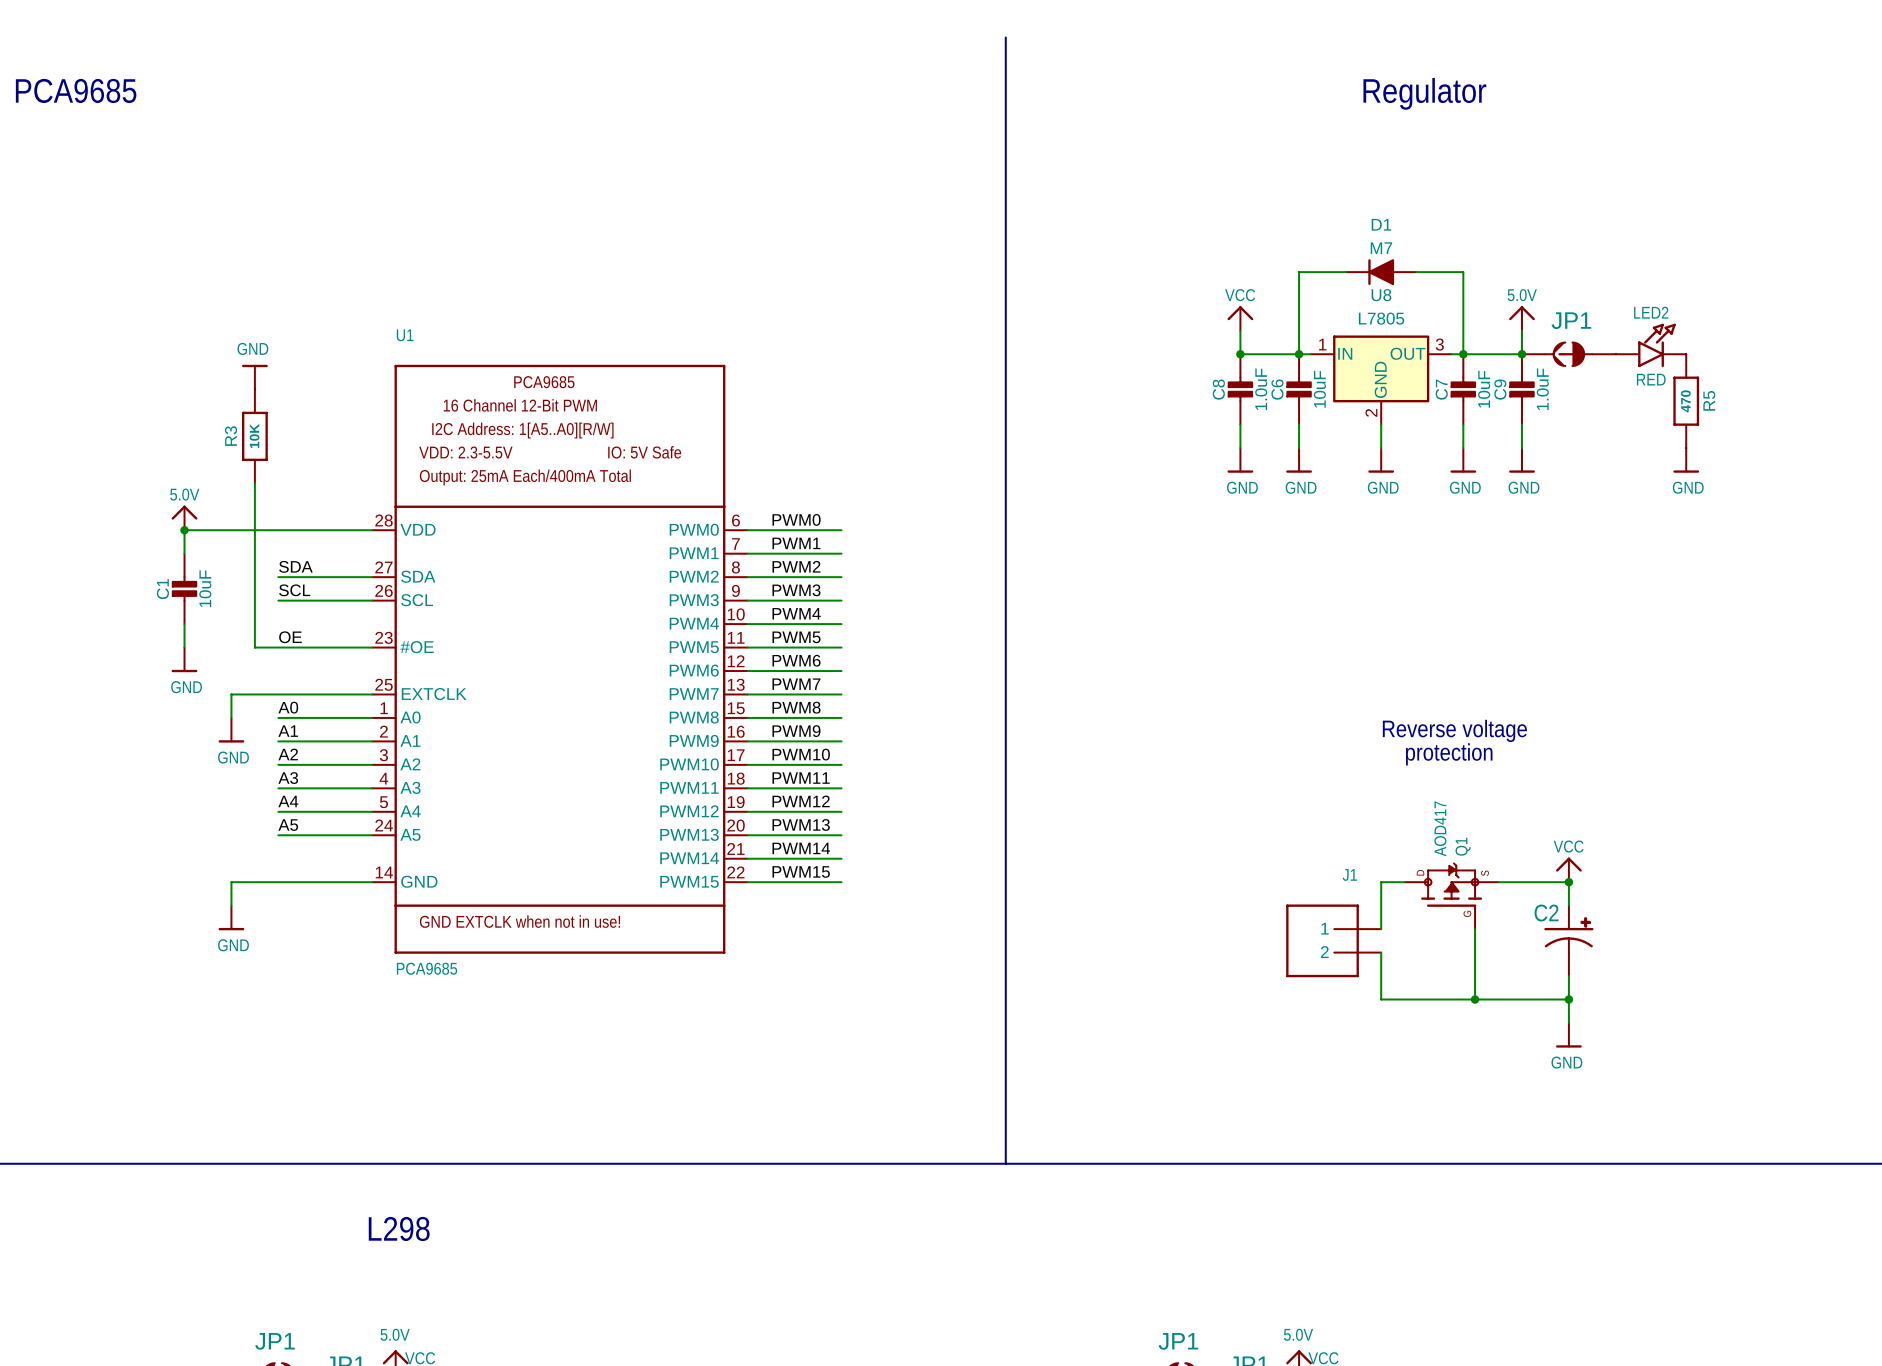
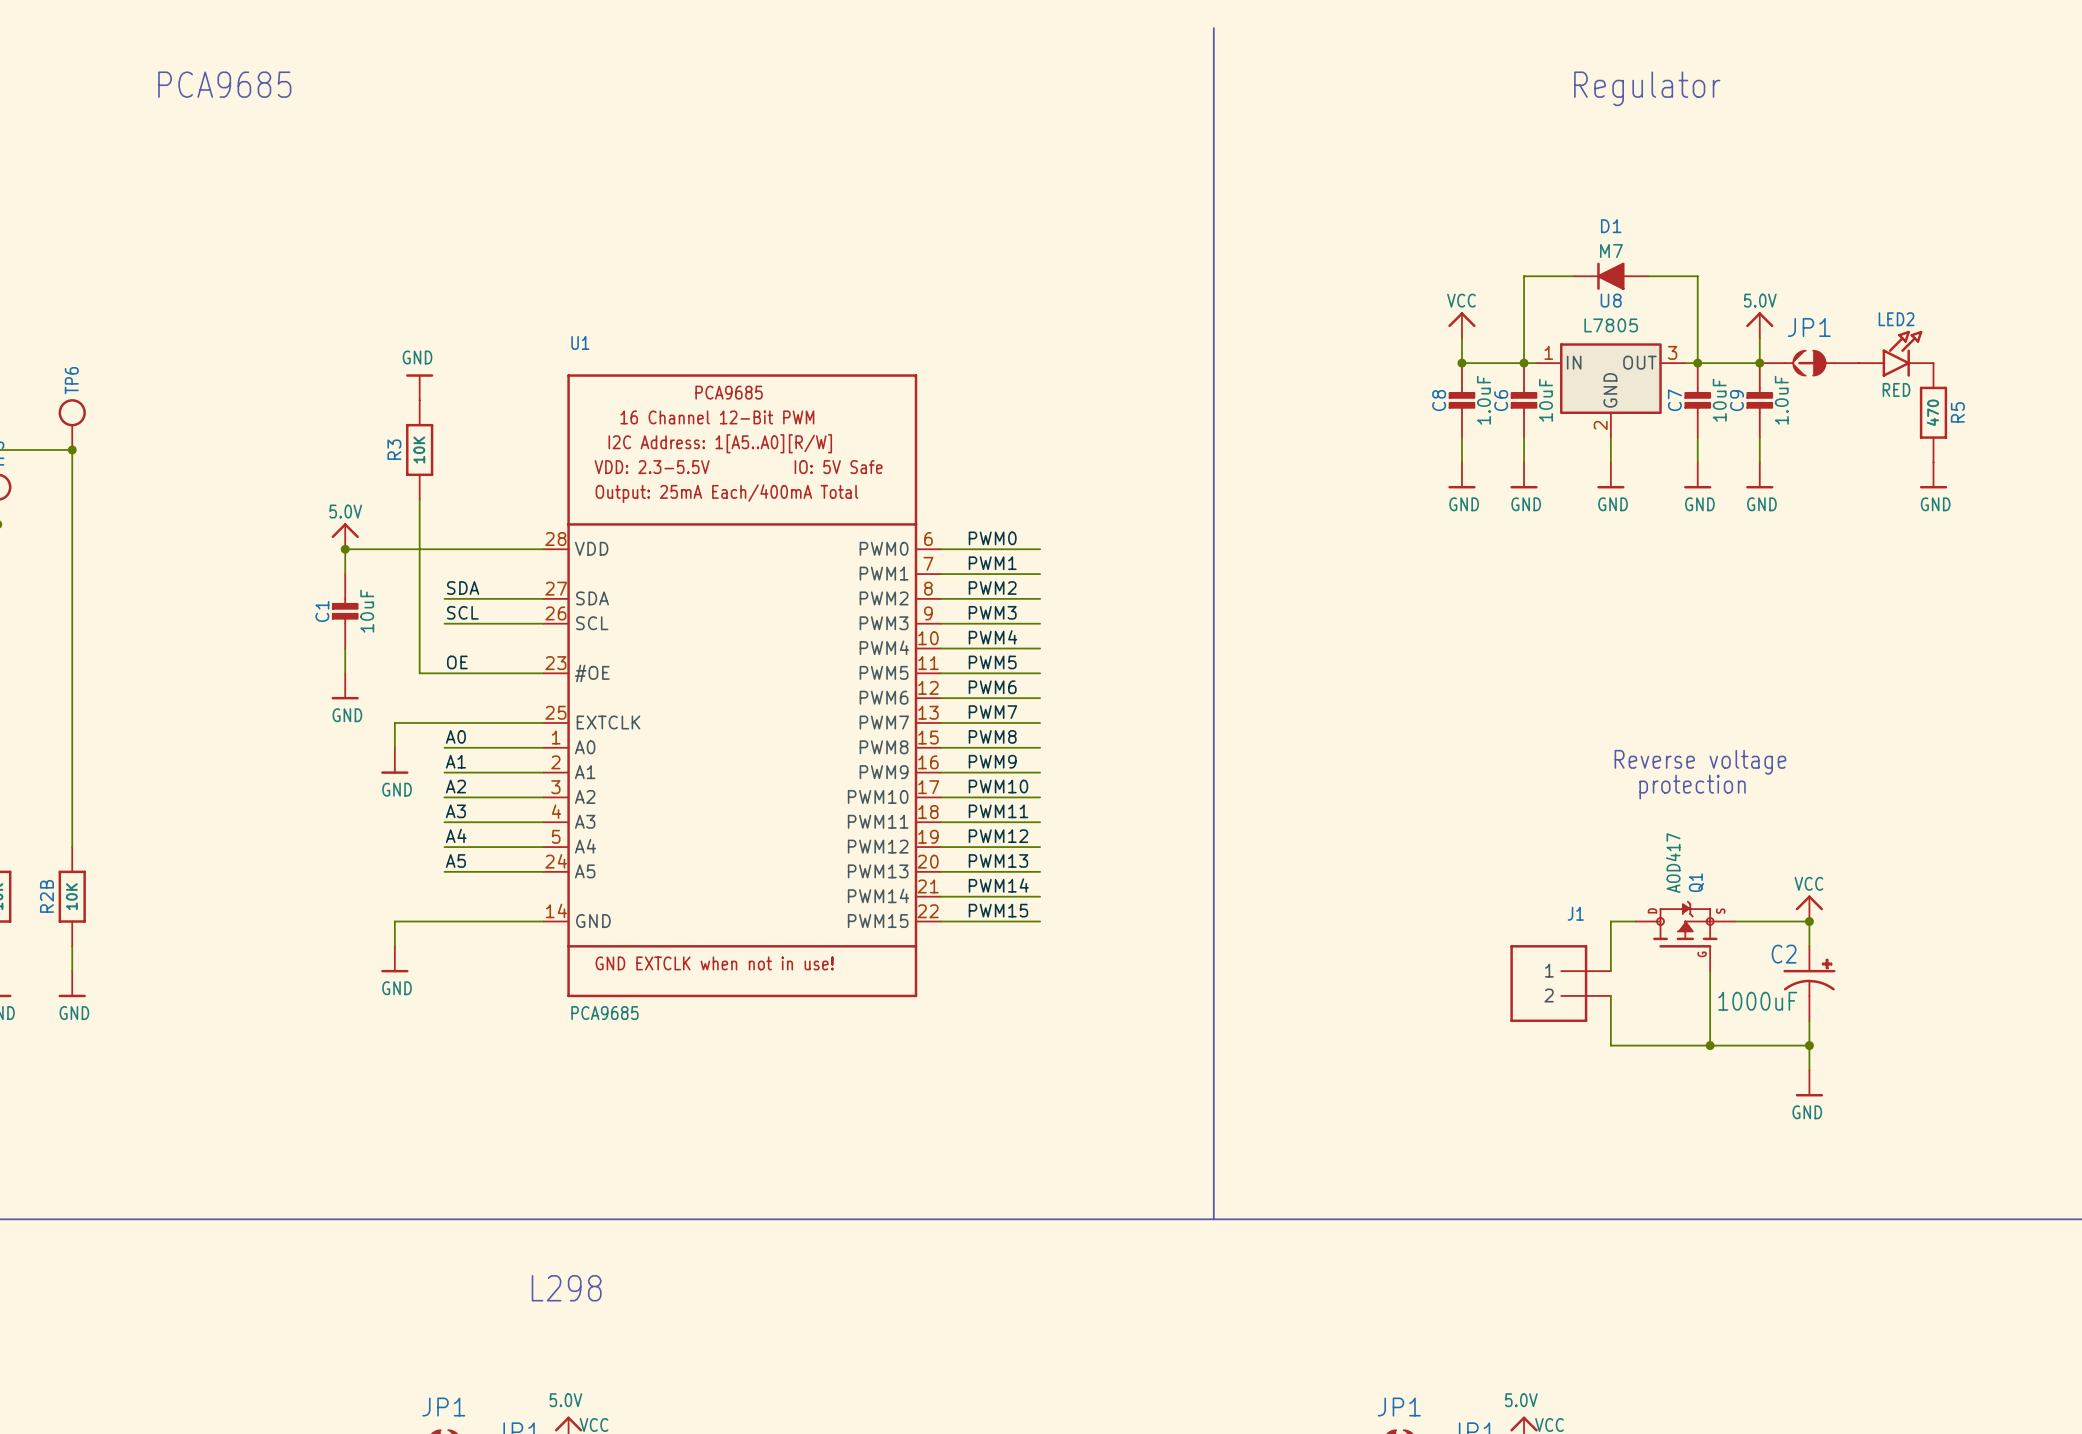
C2 value: none -> 1000uF (1757, 1001)

